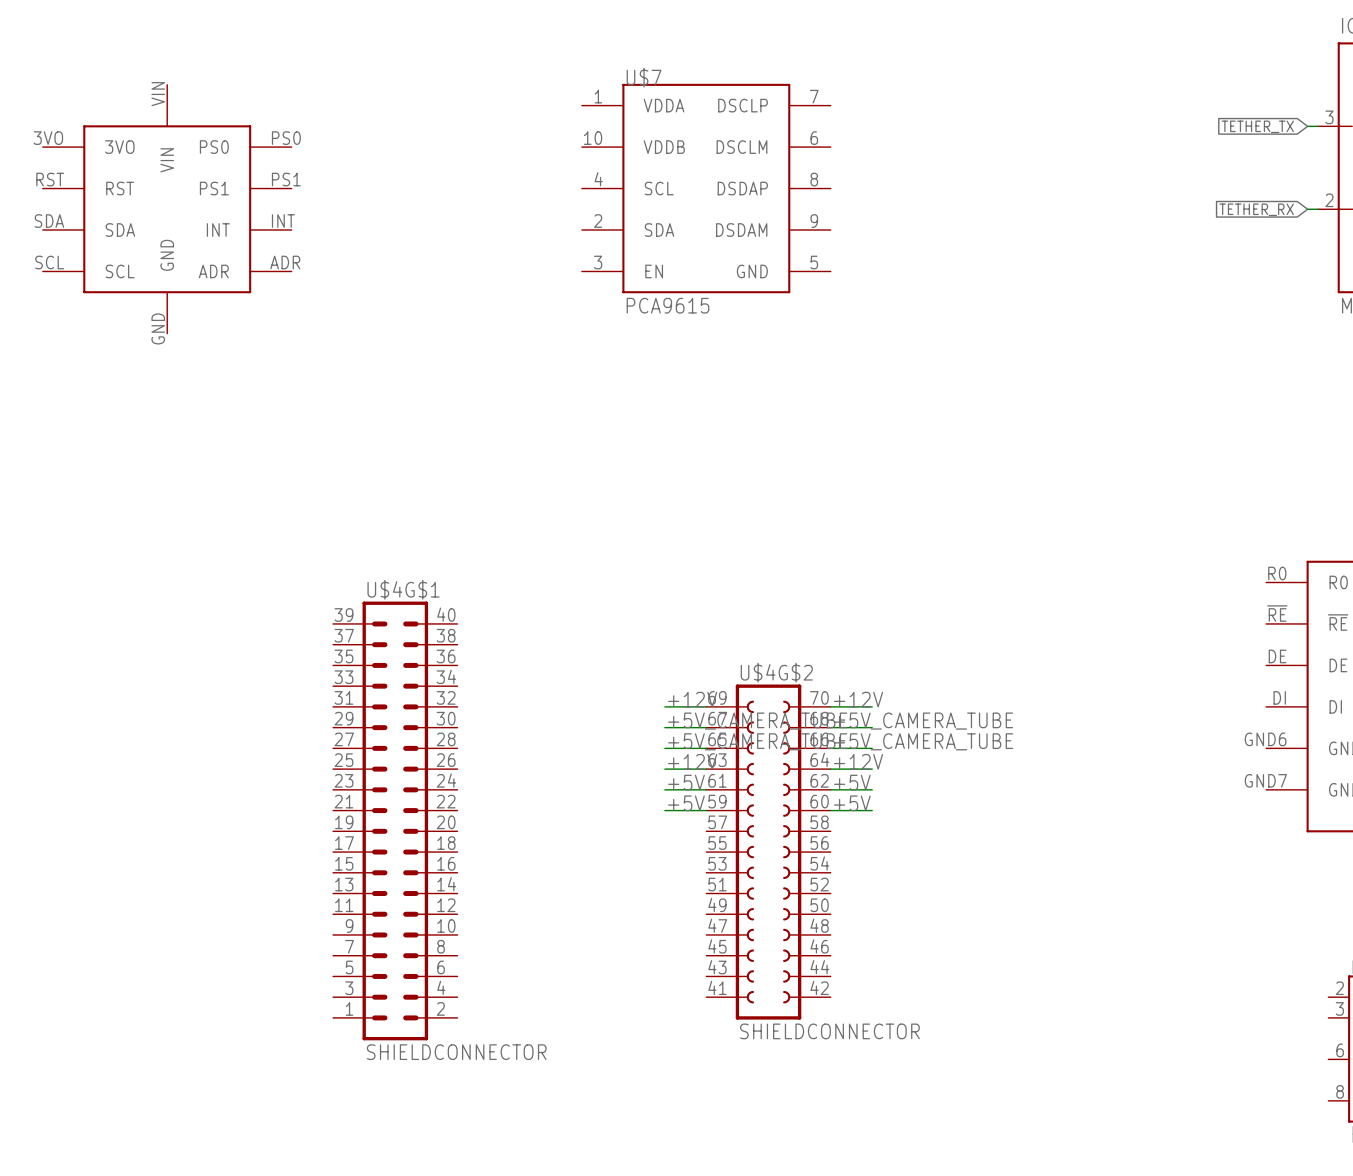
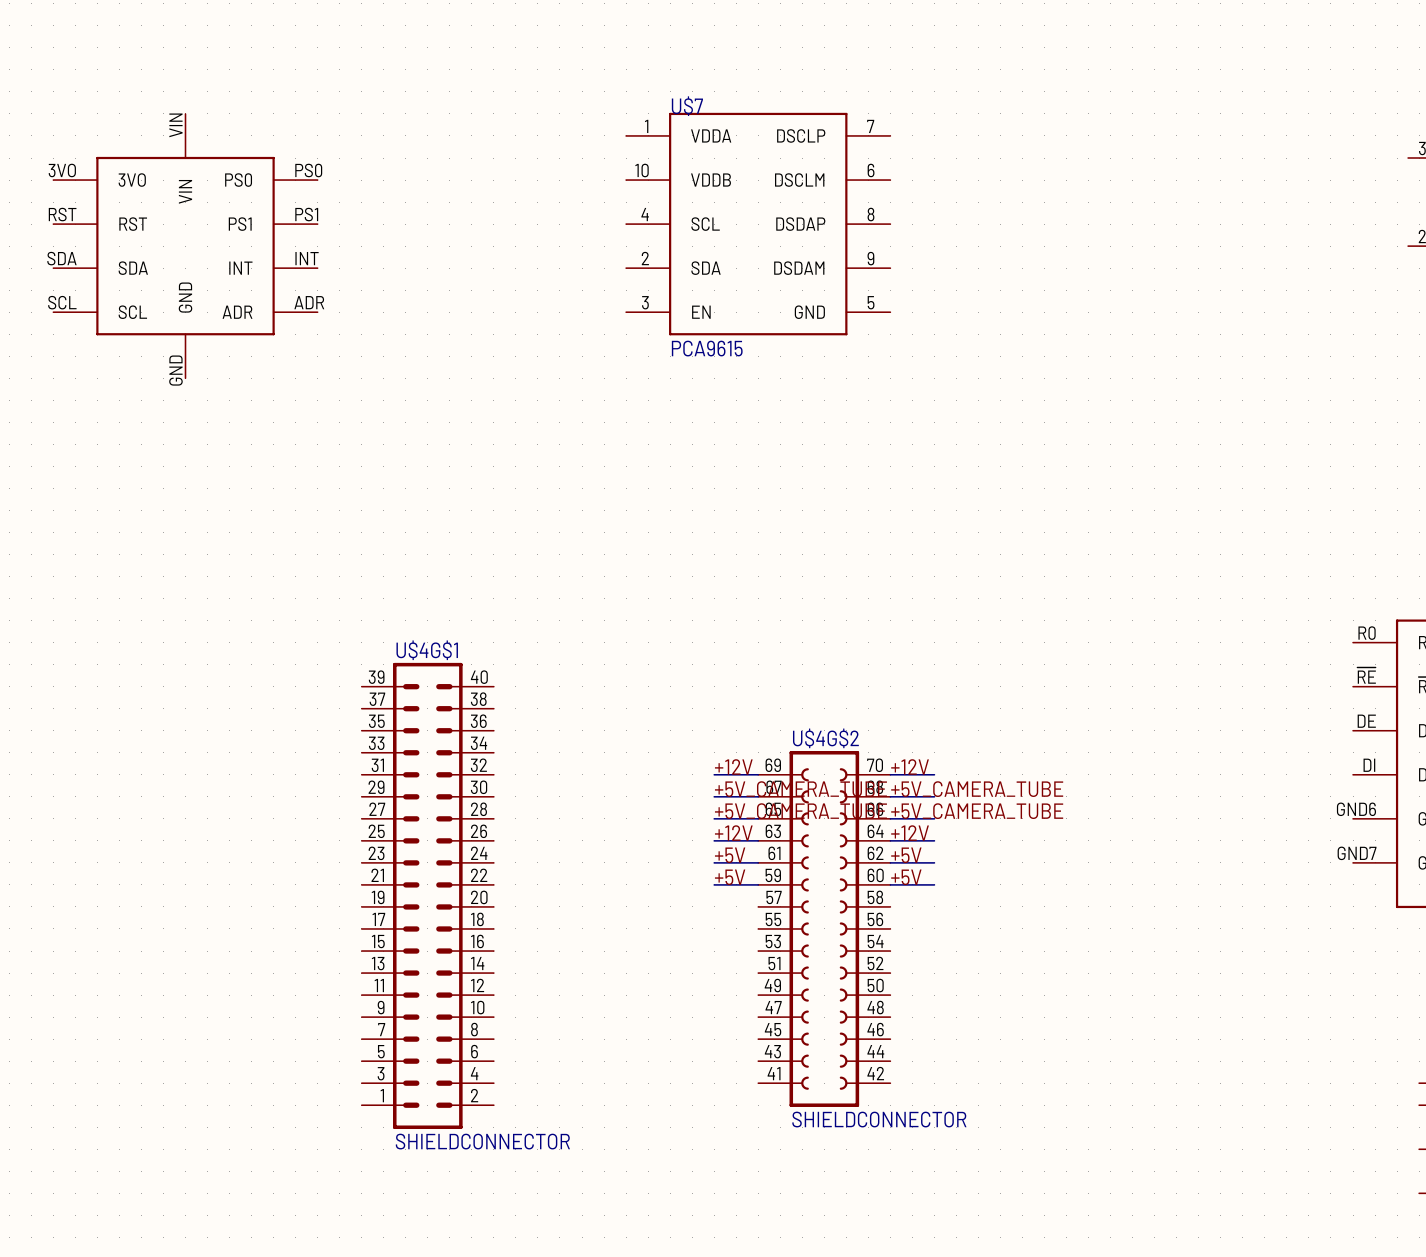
global label: TETHER_TX (1257, 126) -> none
wire: (1307, 126) (1318, 126) -> none
global label: TETHER_RX (1256, 209) -> none
wire: (1307, 209) (1318, 209) -> none

